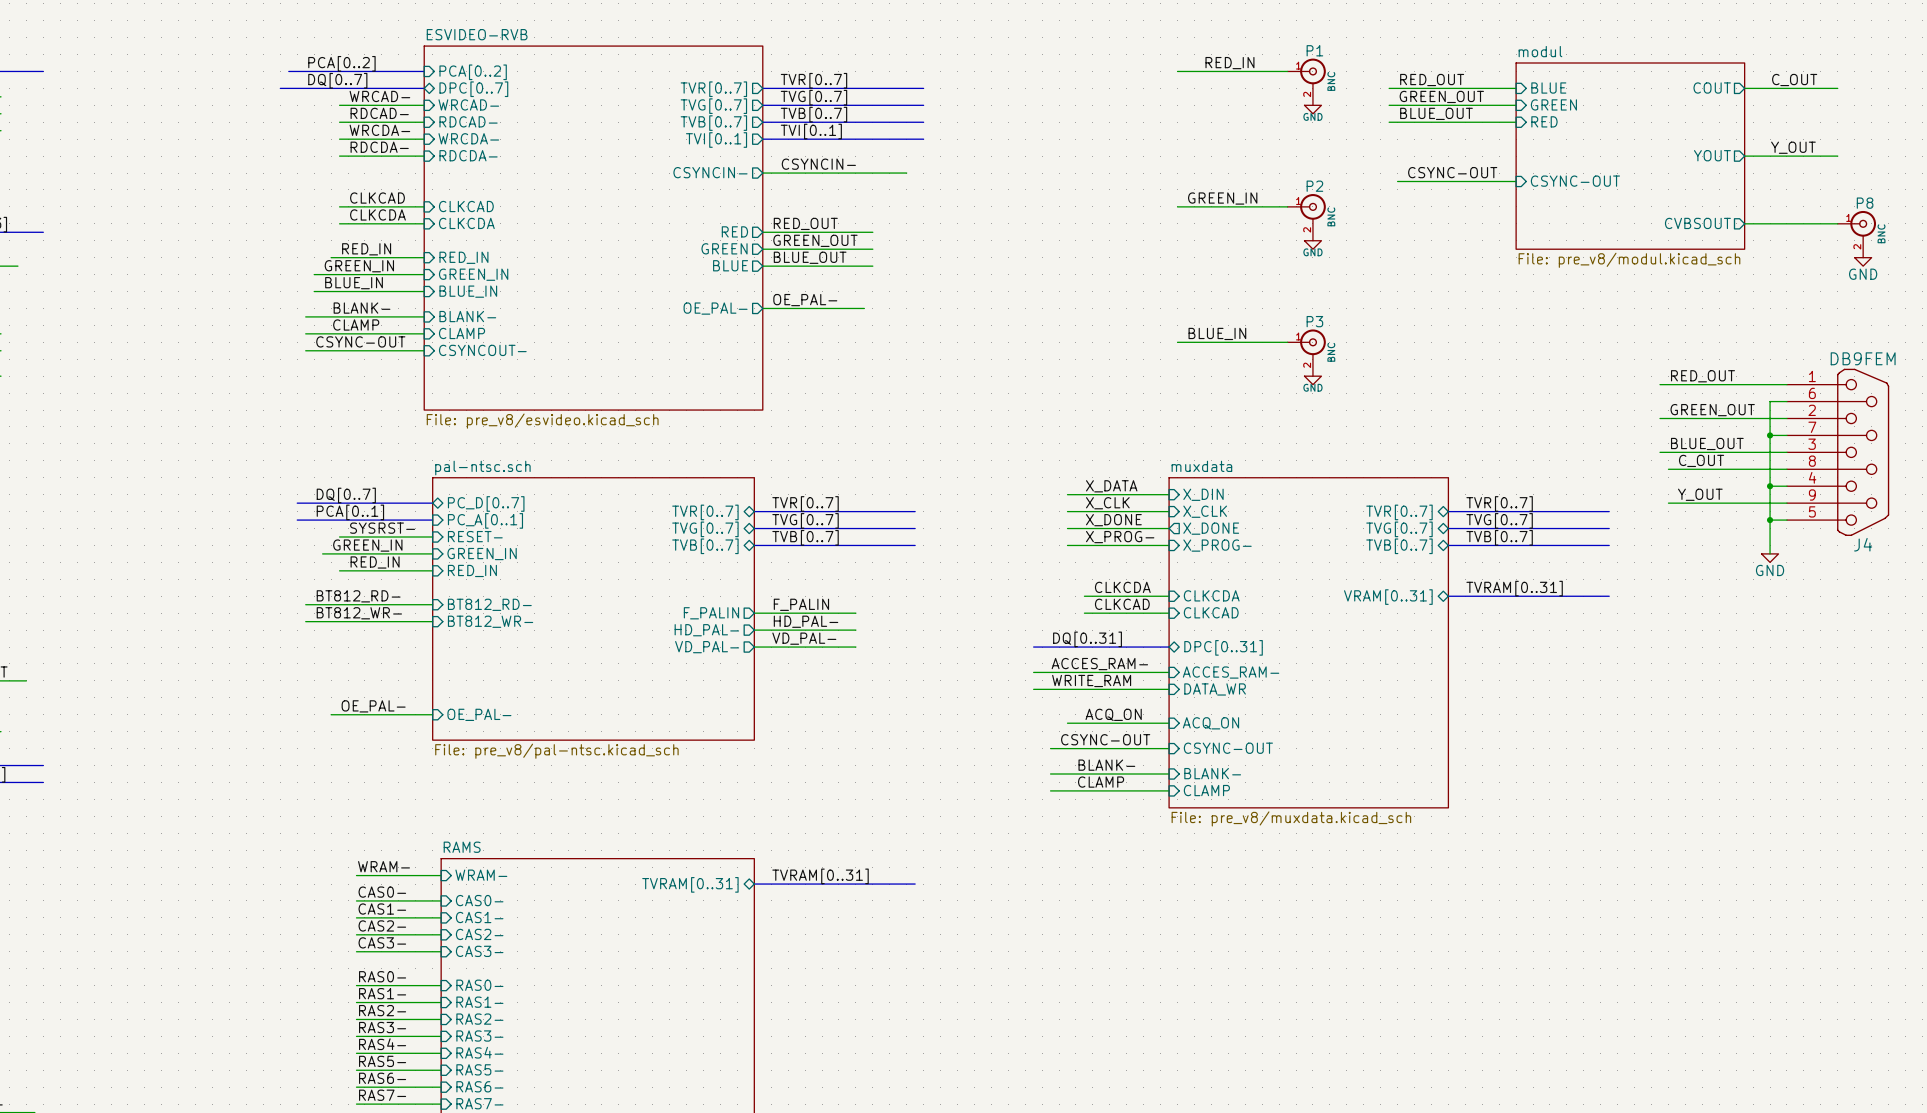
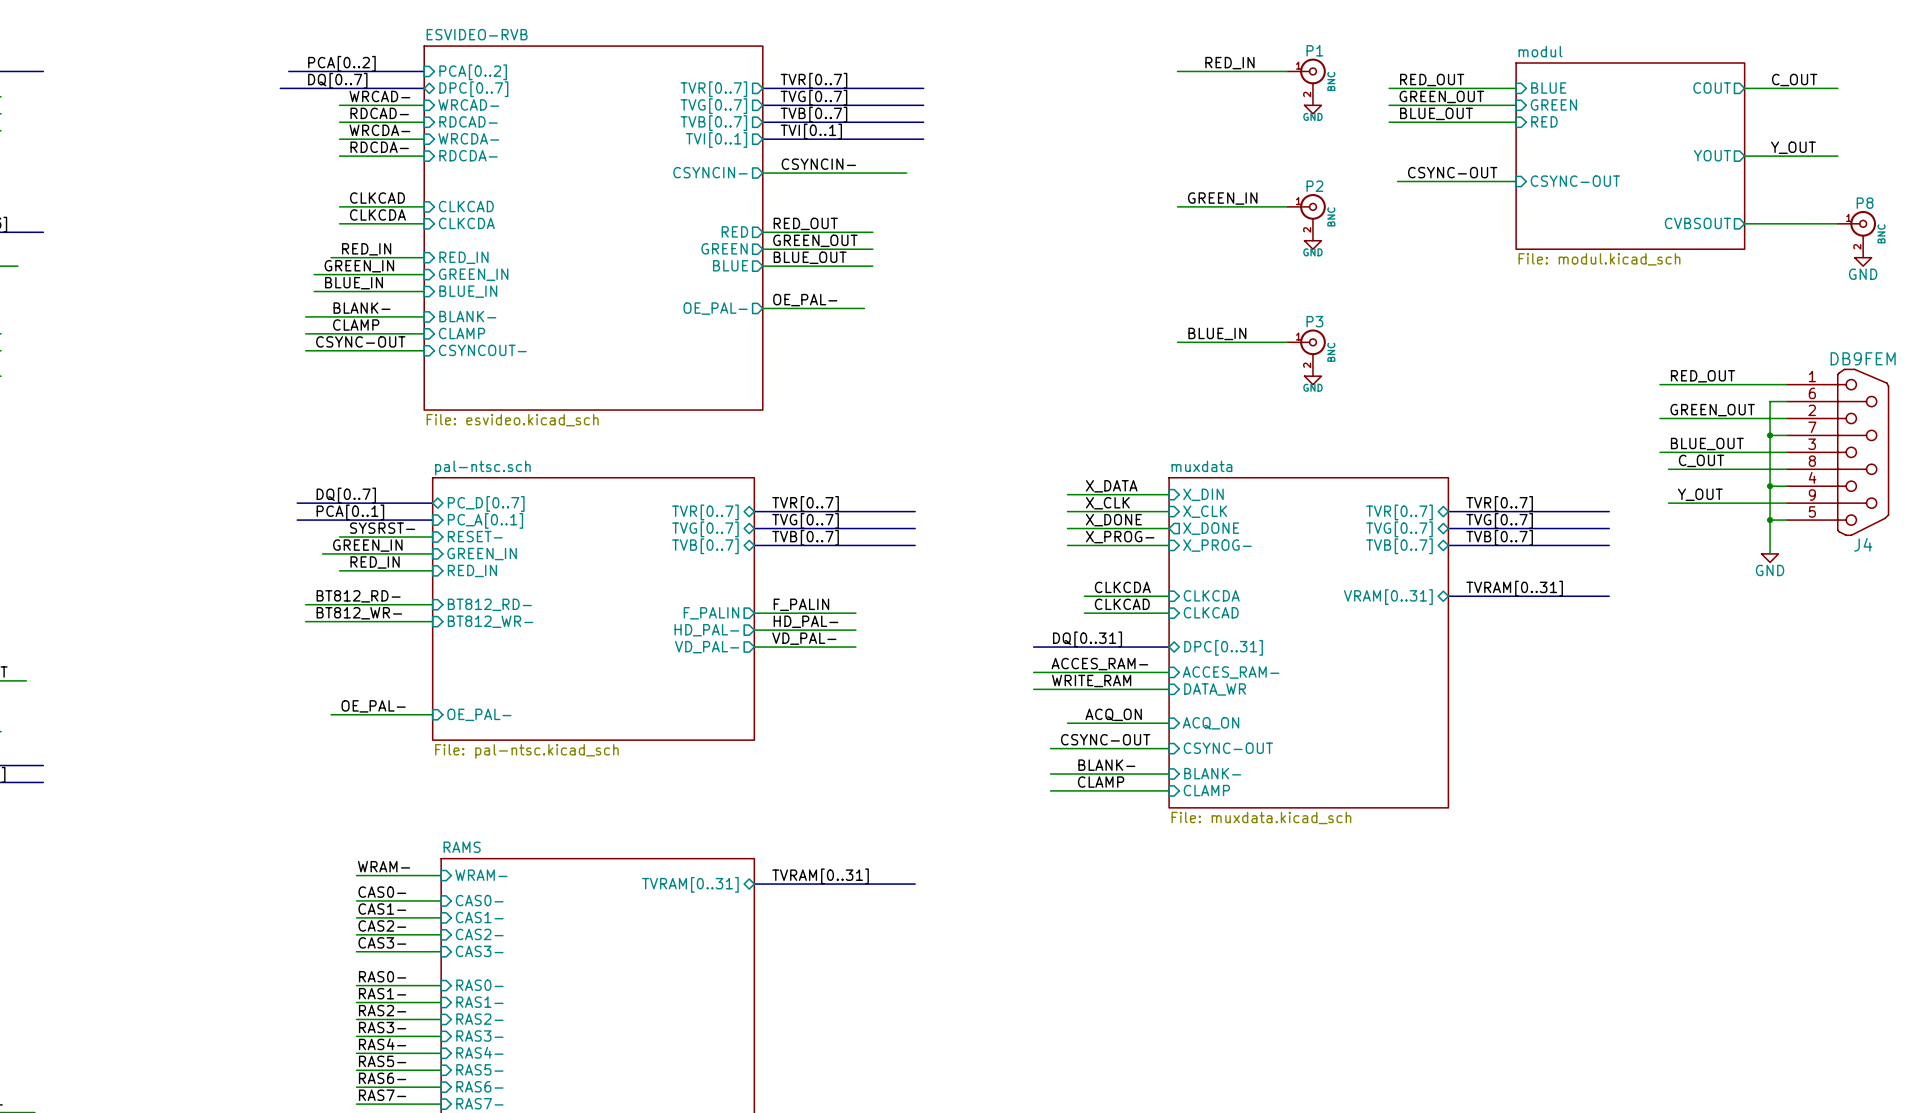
sheet modul value: File: pre_v8/modul.kicad_sch (1629, 260) -> File: modul.kicad_sch (1599, 259)
sheet ESVIDEO-RVB value: File: pre_v8/esvideo.kicad_sch (542, 421) -> File: esvideo.kicad_sch (512, 420)
sheet pal-ntsc.sch value: File: pre_v8/pal-ntsc.kicad_sch (556, 751) -> File: pal-ntsc.kicad_sch (526, 751)
sheet muxdata value: File: pre_v8/muxdata.kicad_sch (1291, 818) -> File: muxdata.kicad_sch (1261, 817)

